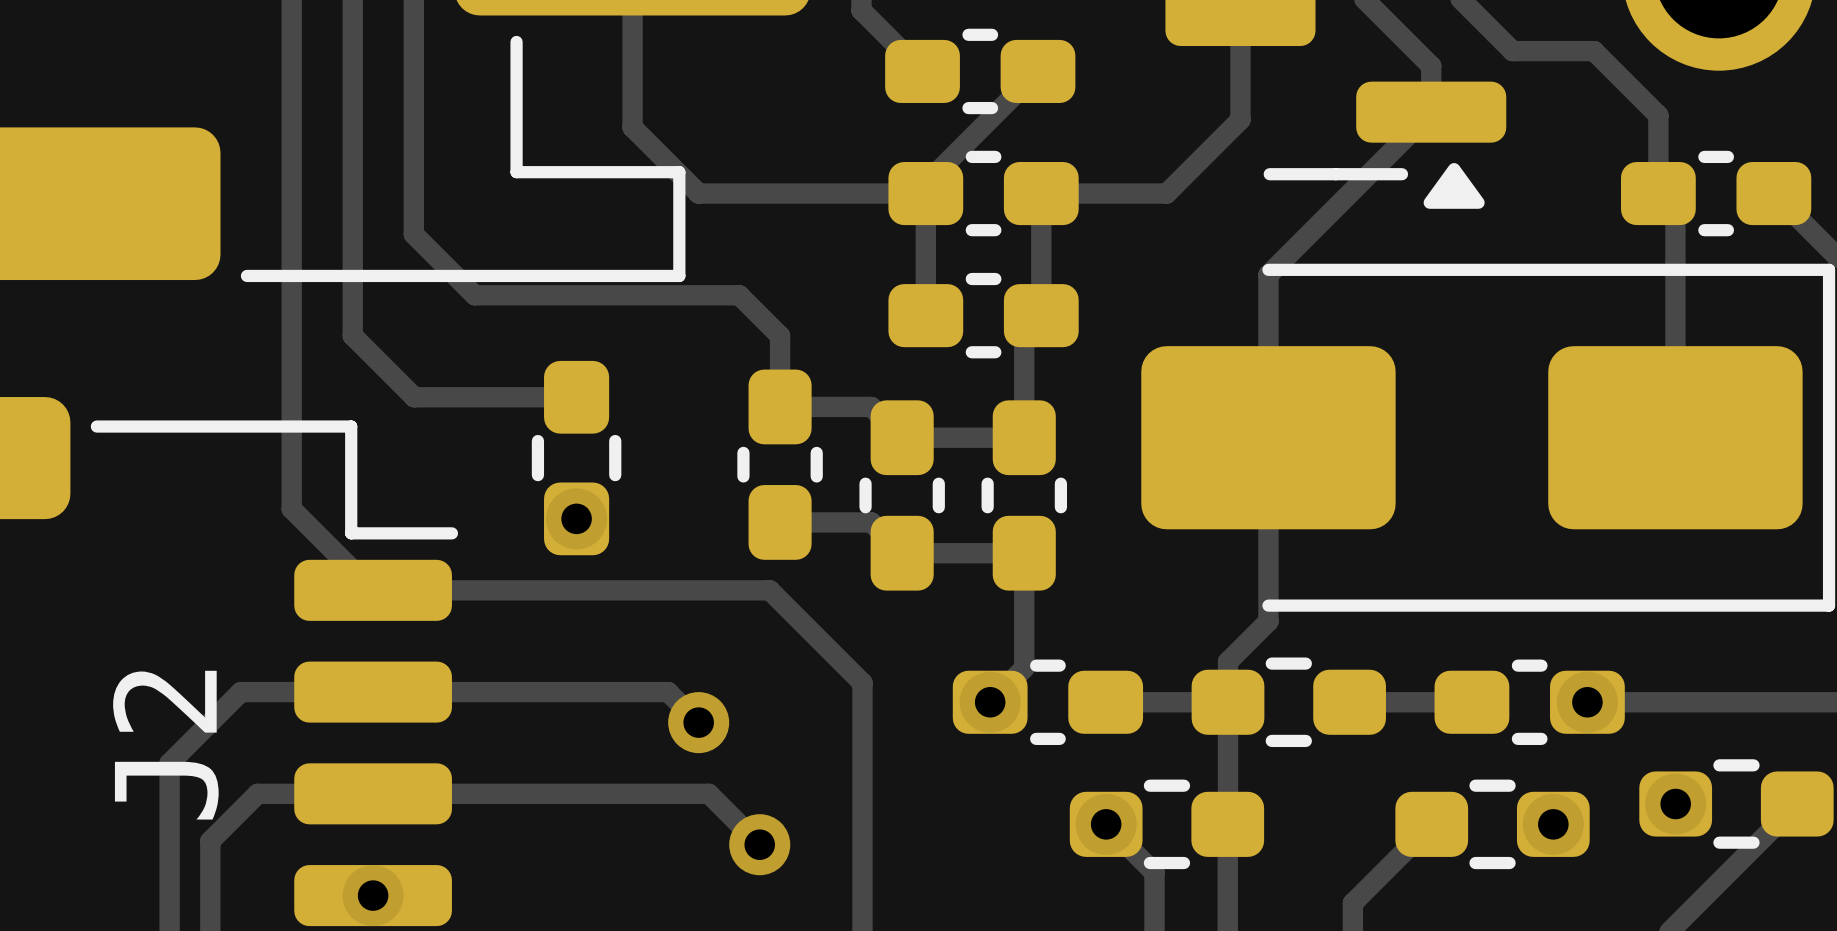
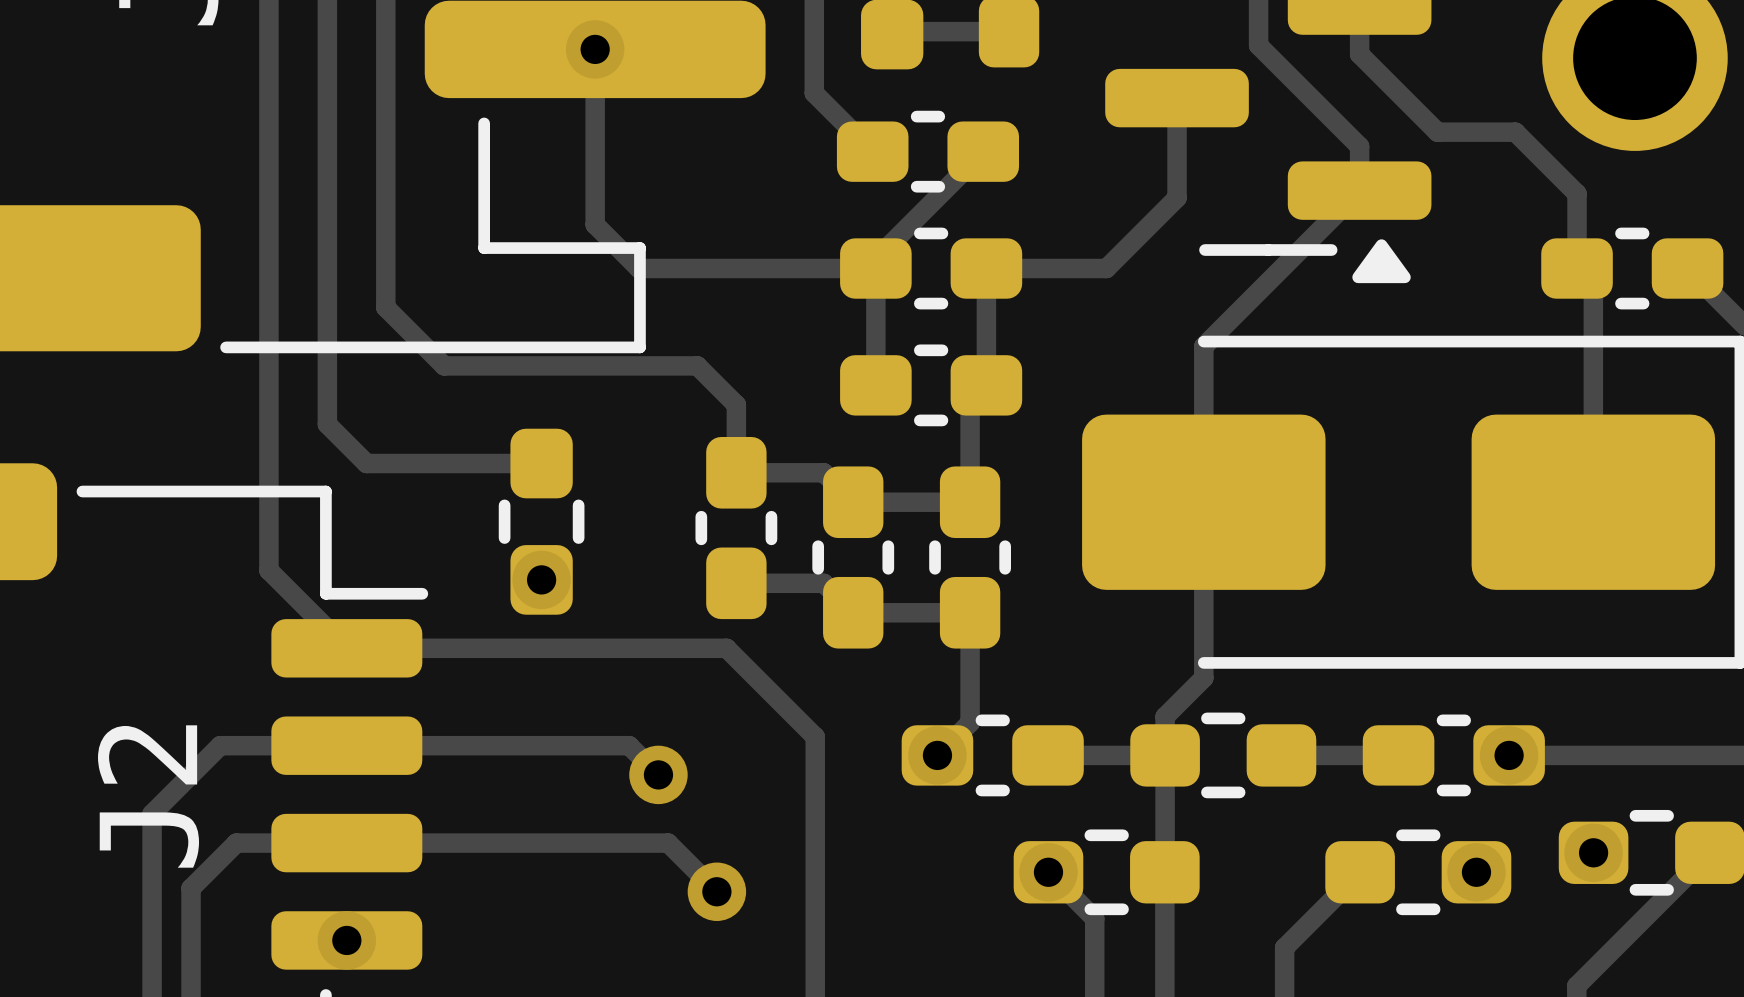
track: (632, 127) (698, 193) -> (595, 205) (595, 224) (638, 268) (658, 268)
track: (352, 335) (414, 397) -> (327, 404) (327, 424) (366, 463) (386, 463)

